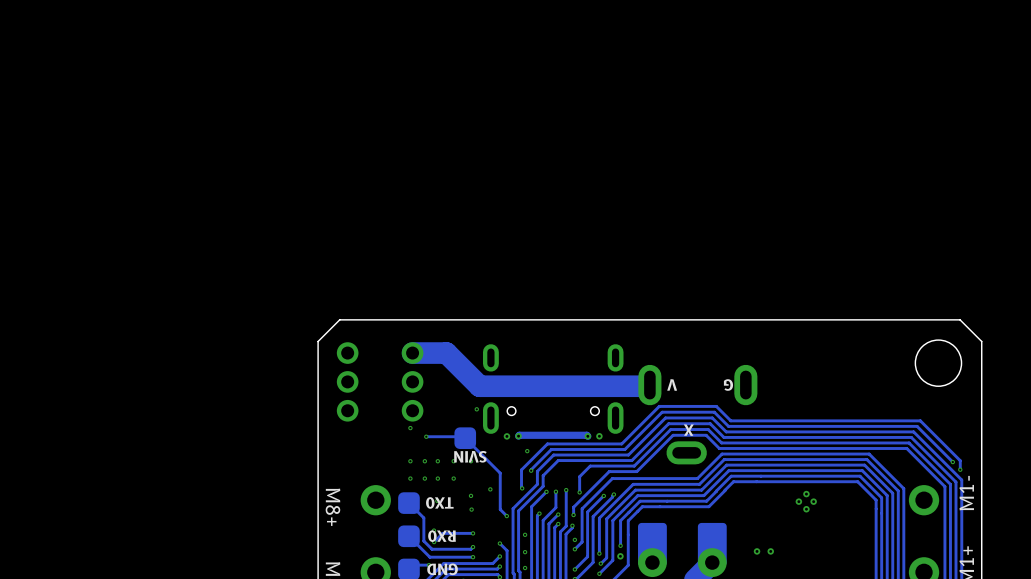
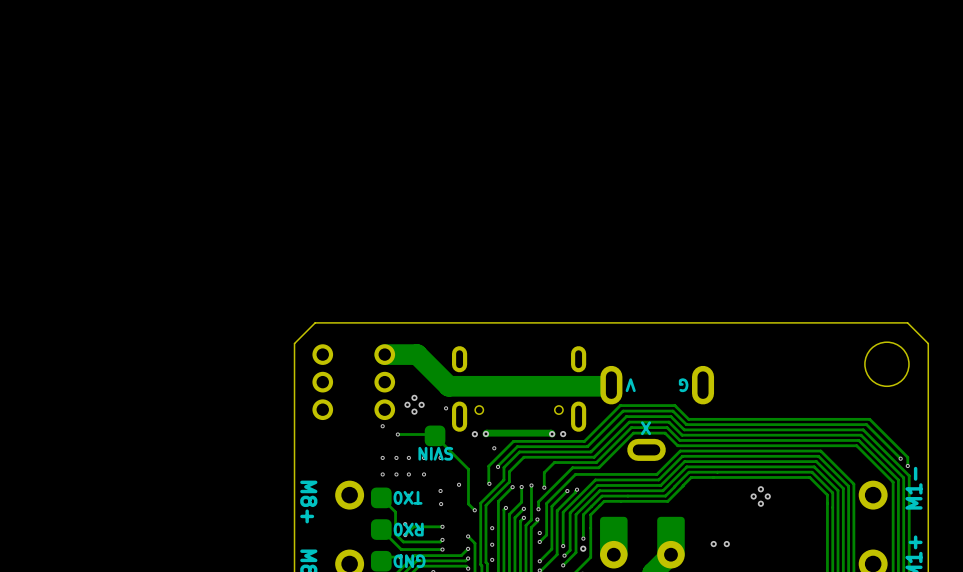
via: none -> (414, 397)
via: none -> (407, 404)
via: none -> (421, 404)
via: none -> (414, 411)

